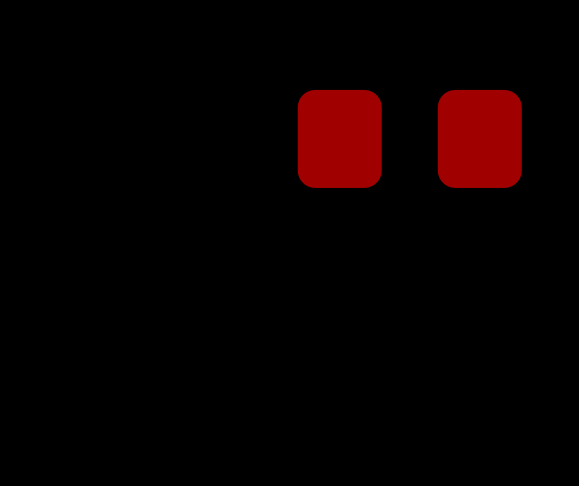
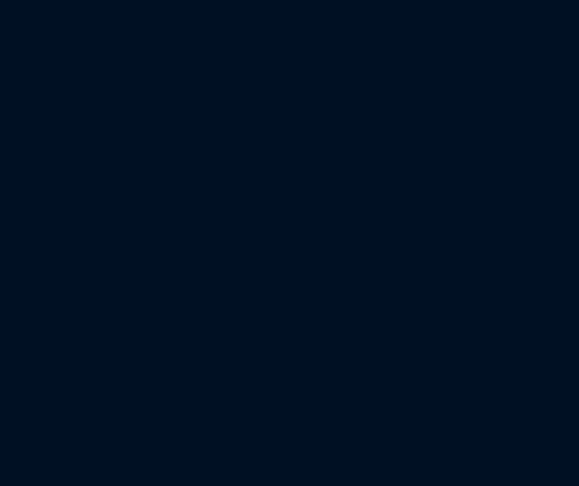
part: (409, 138) -> none

